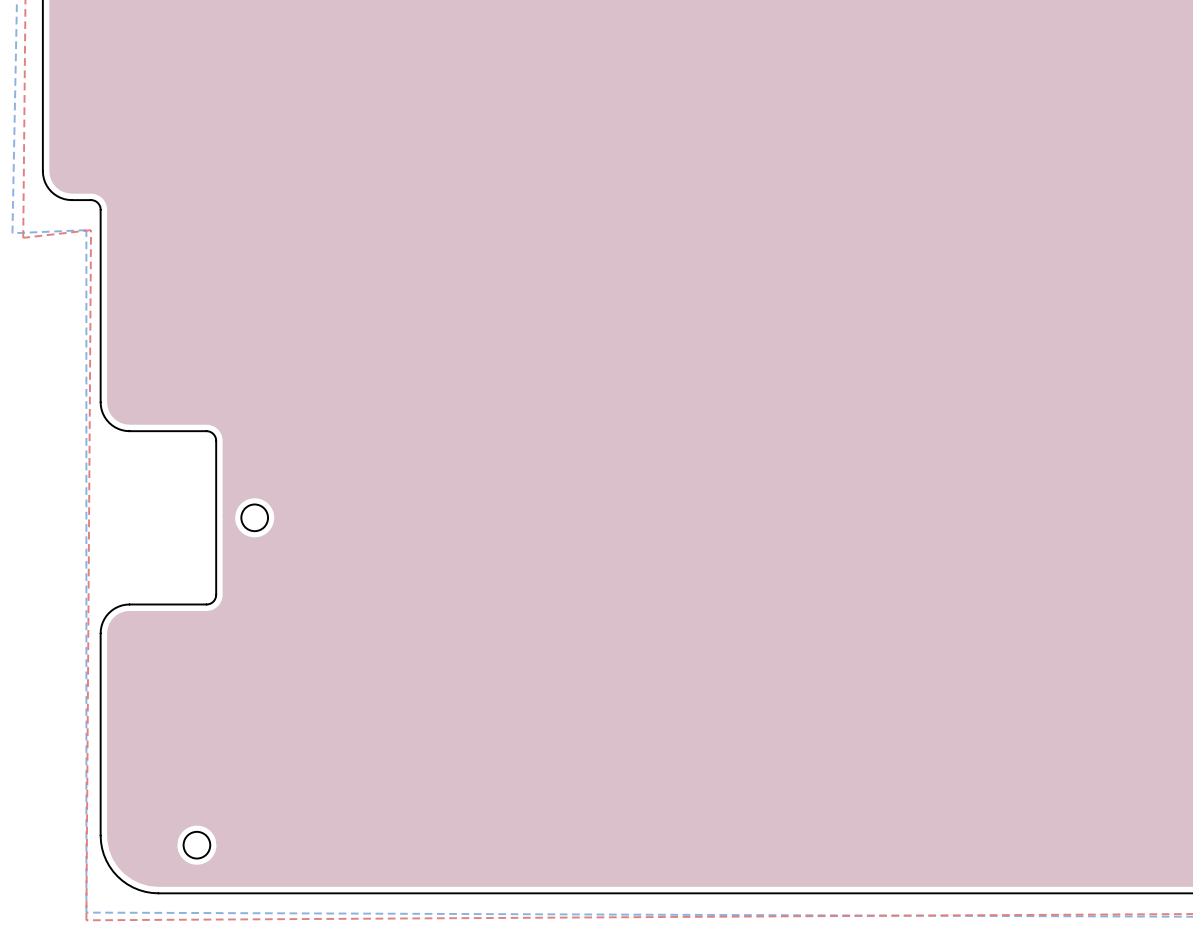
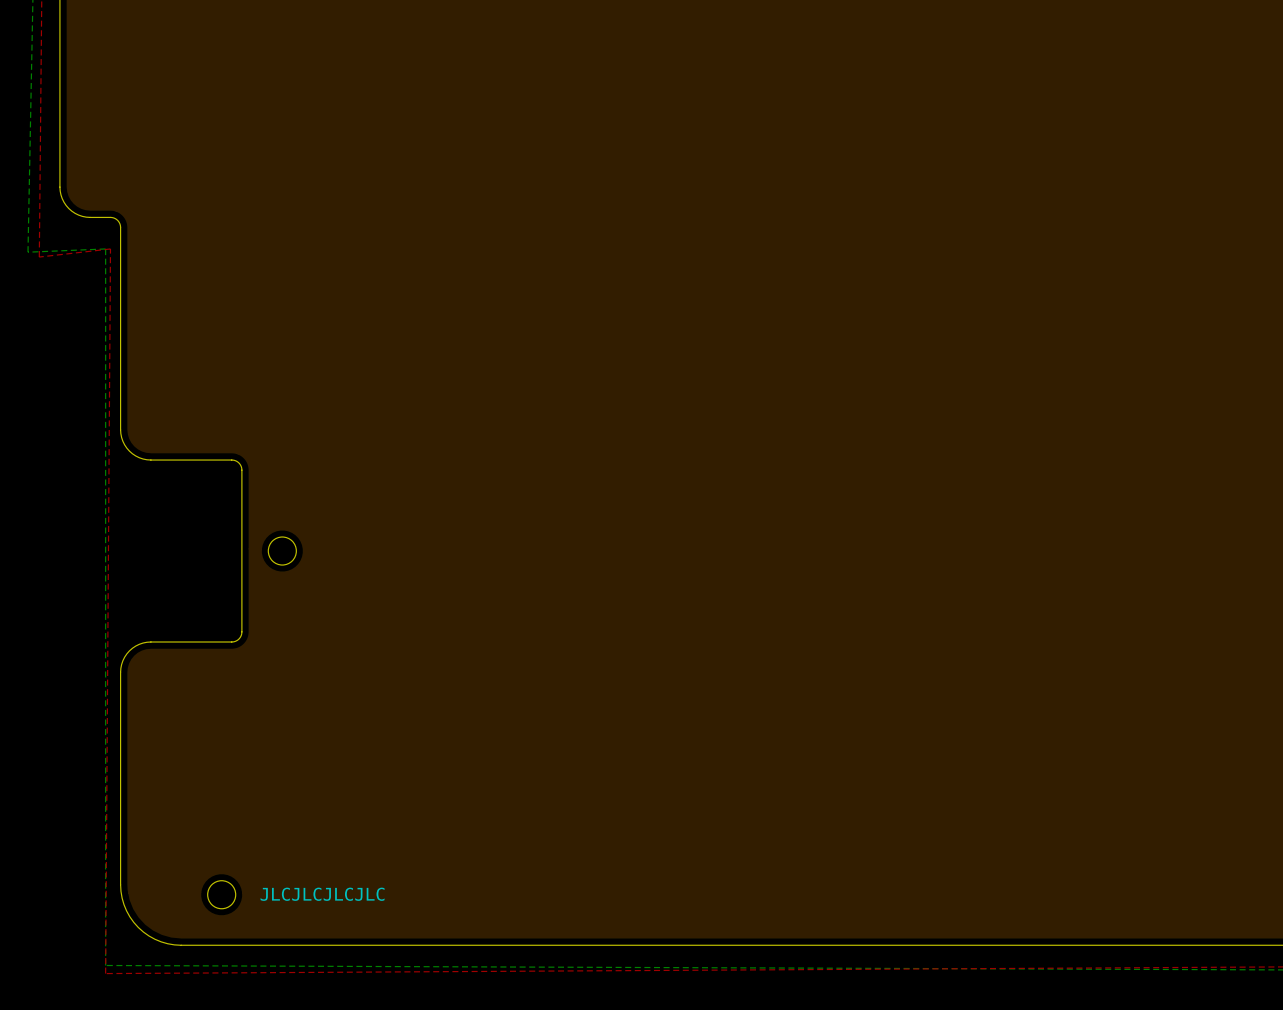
text: none -> JLCJLCJLCJLC (322, 894)

